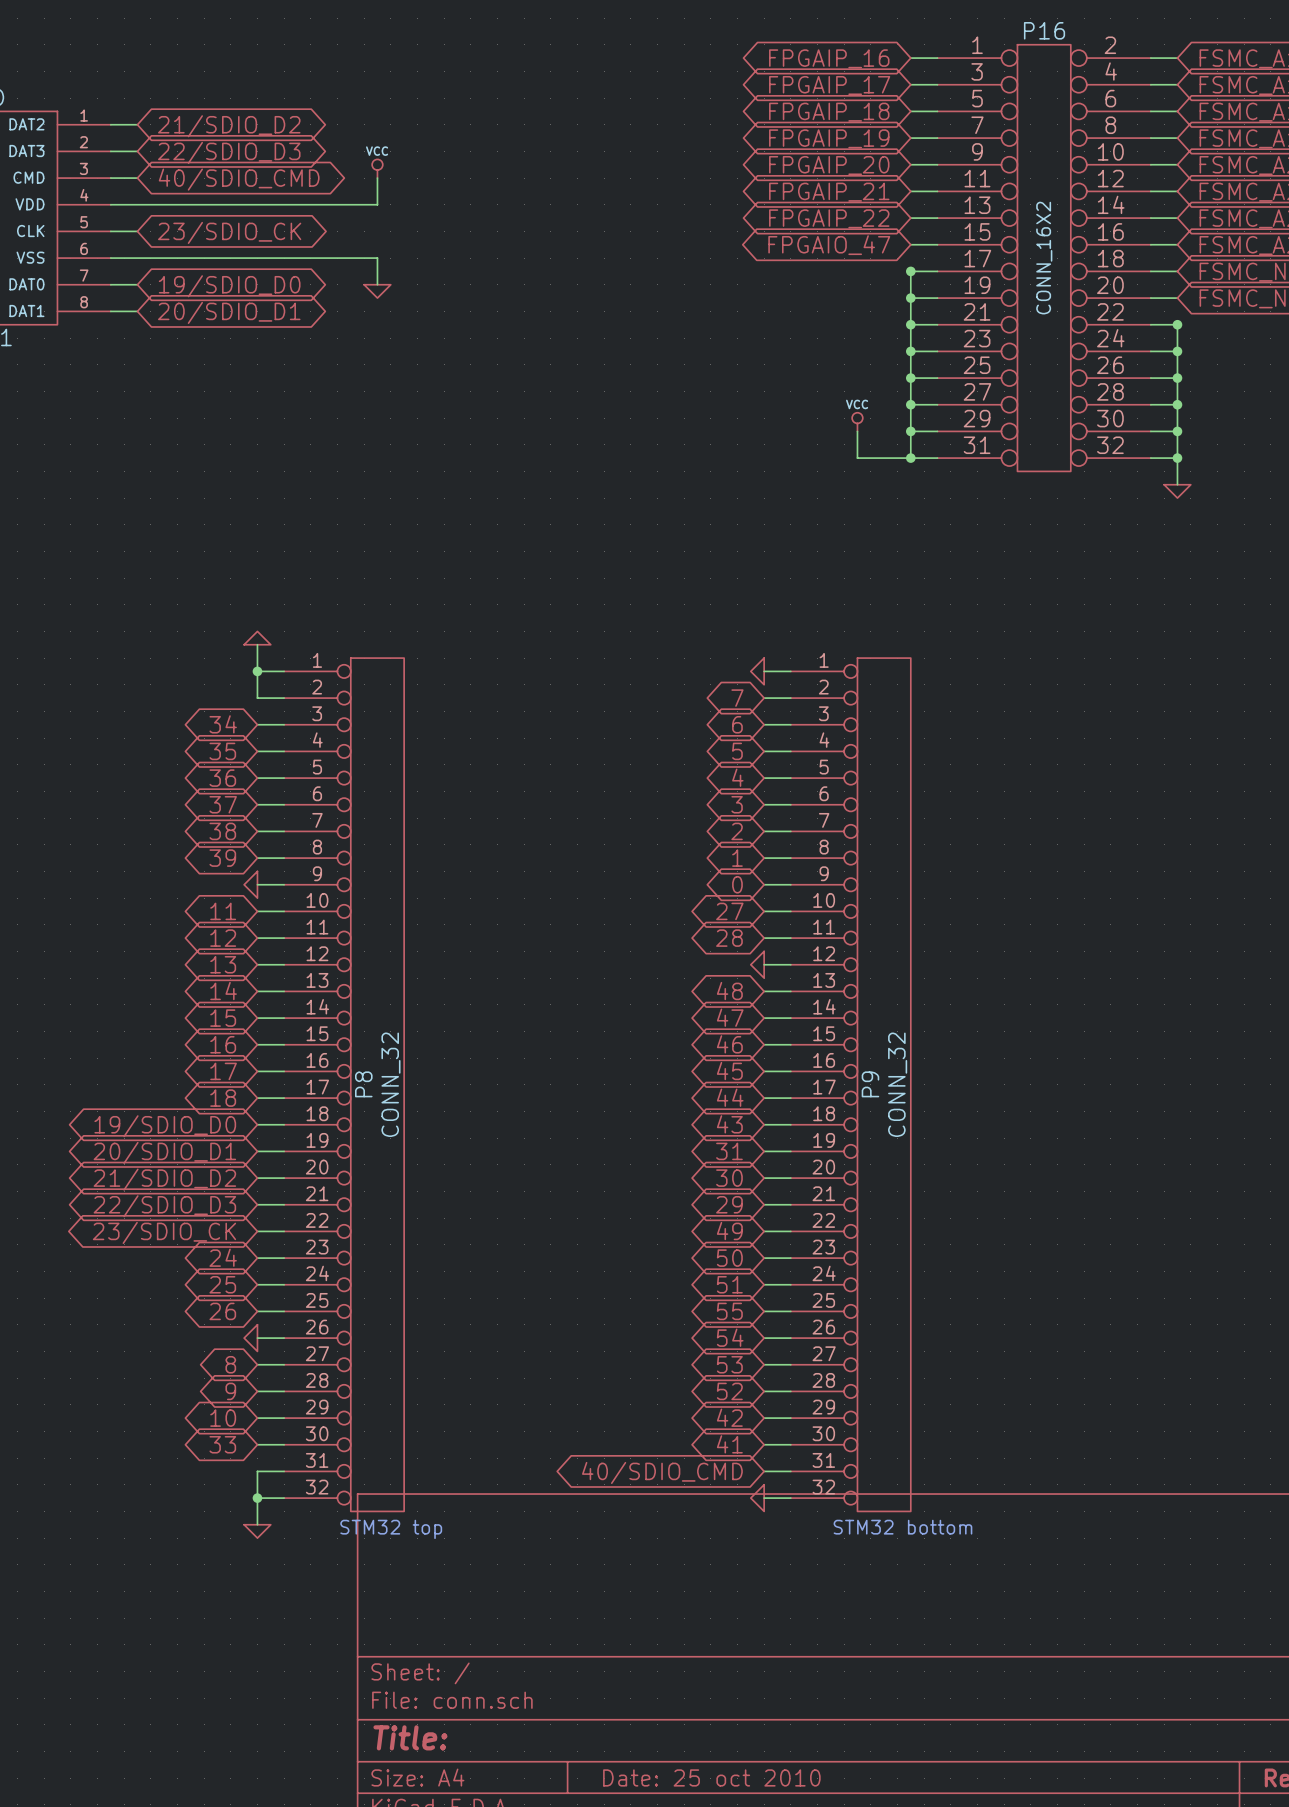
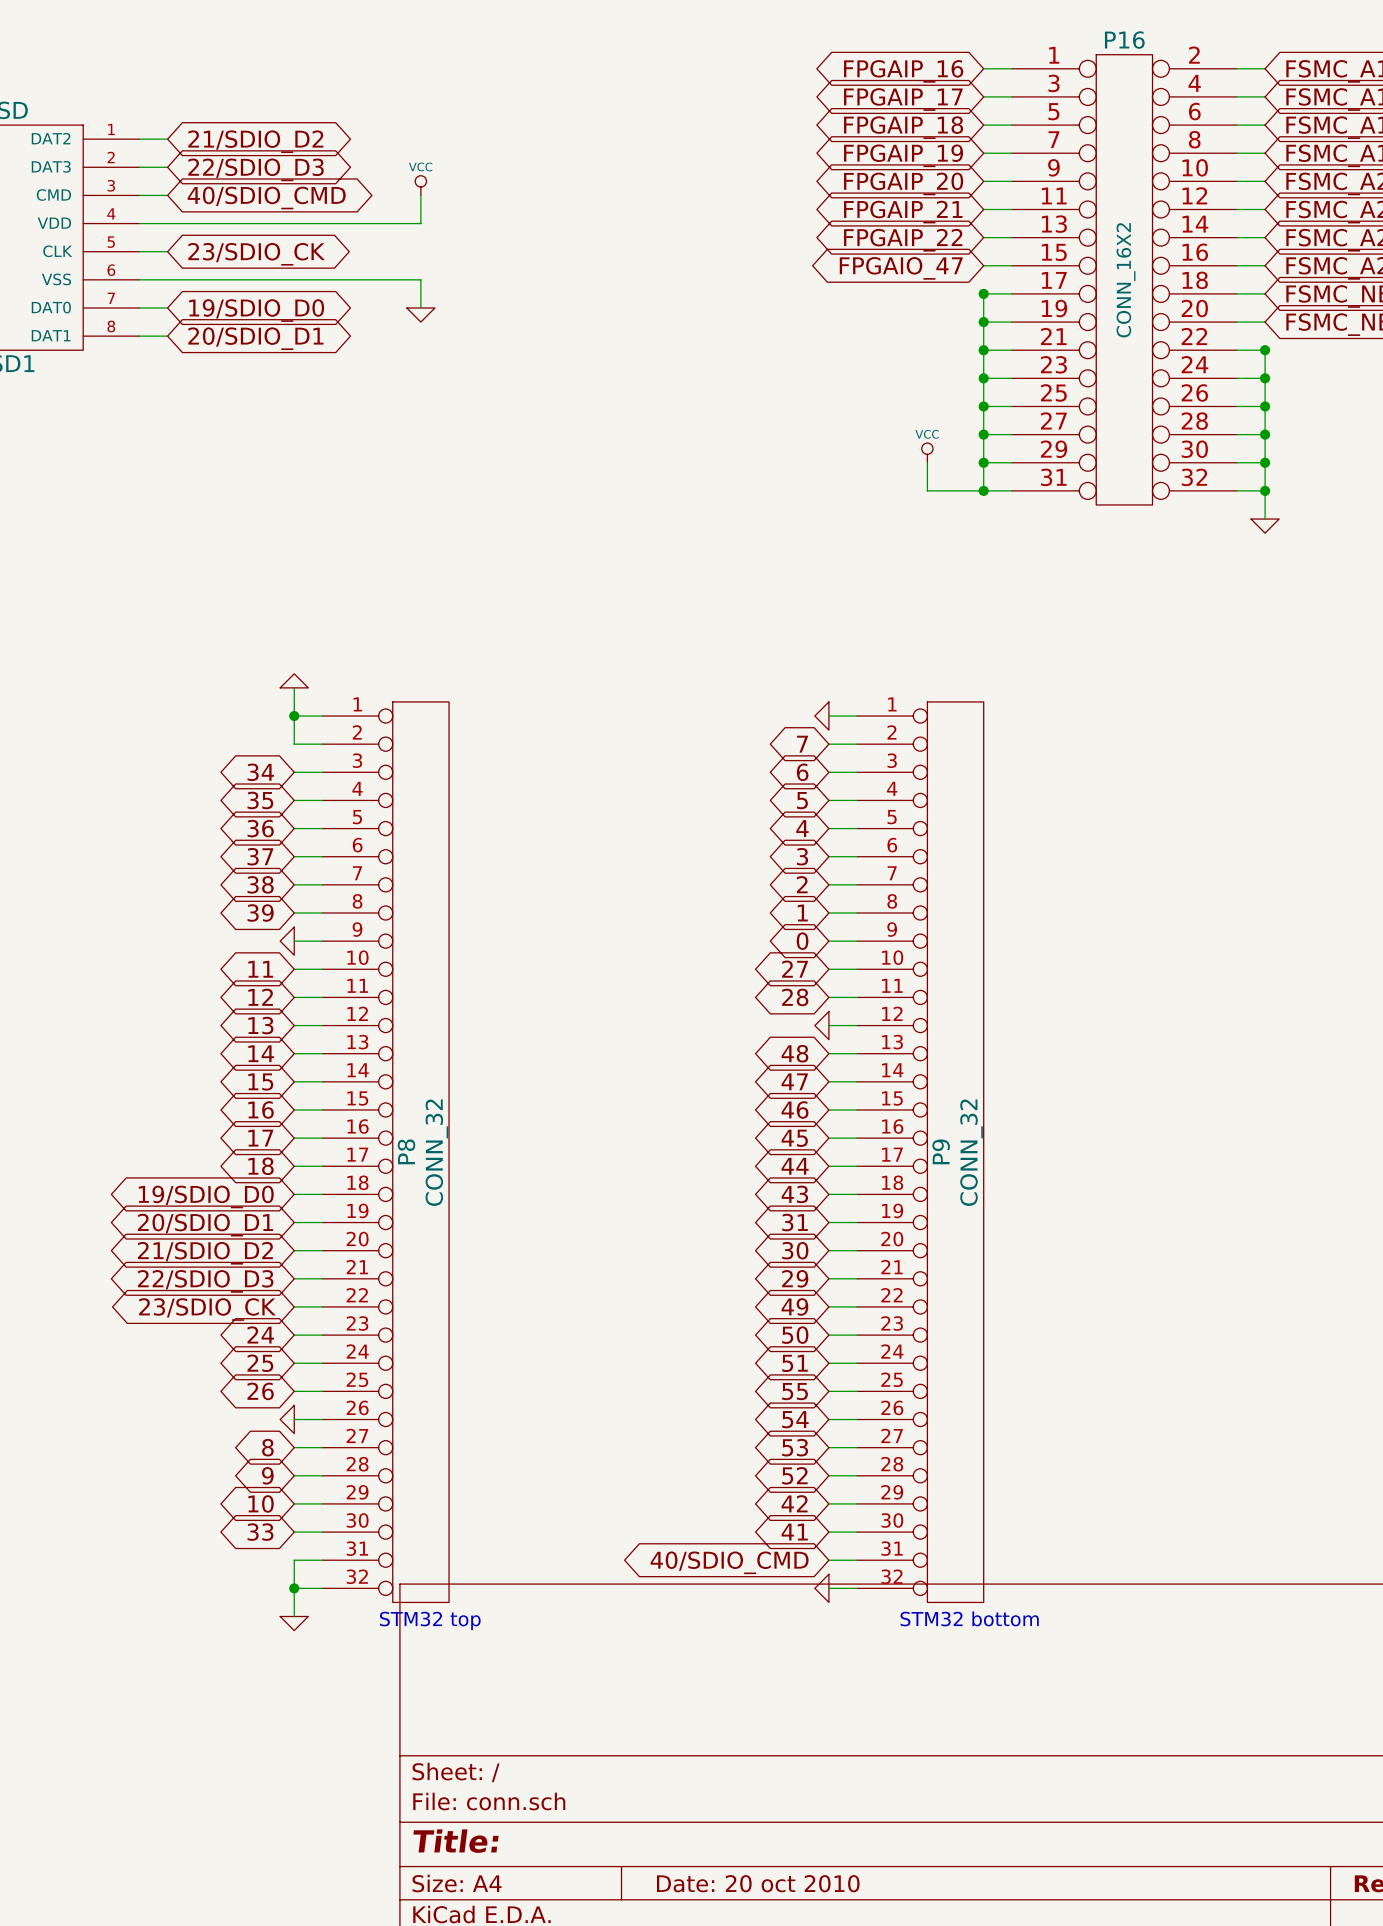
title block: Date: 25 oct 2010 (711, 1777) -> Date: 20 oct 2010 (758, 1883)

